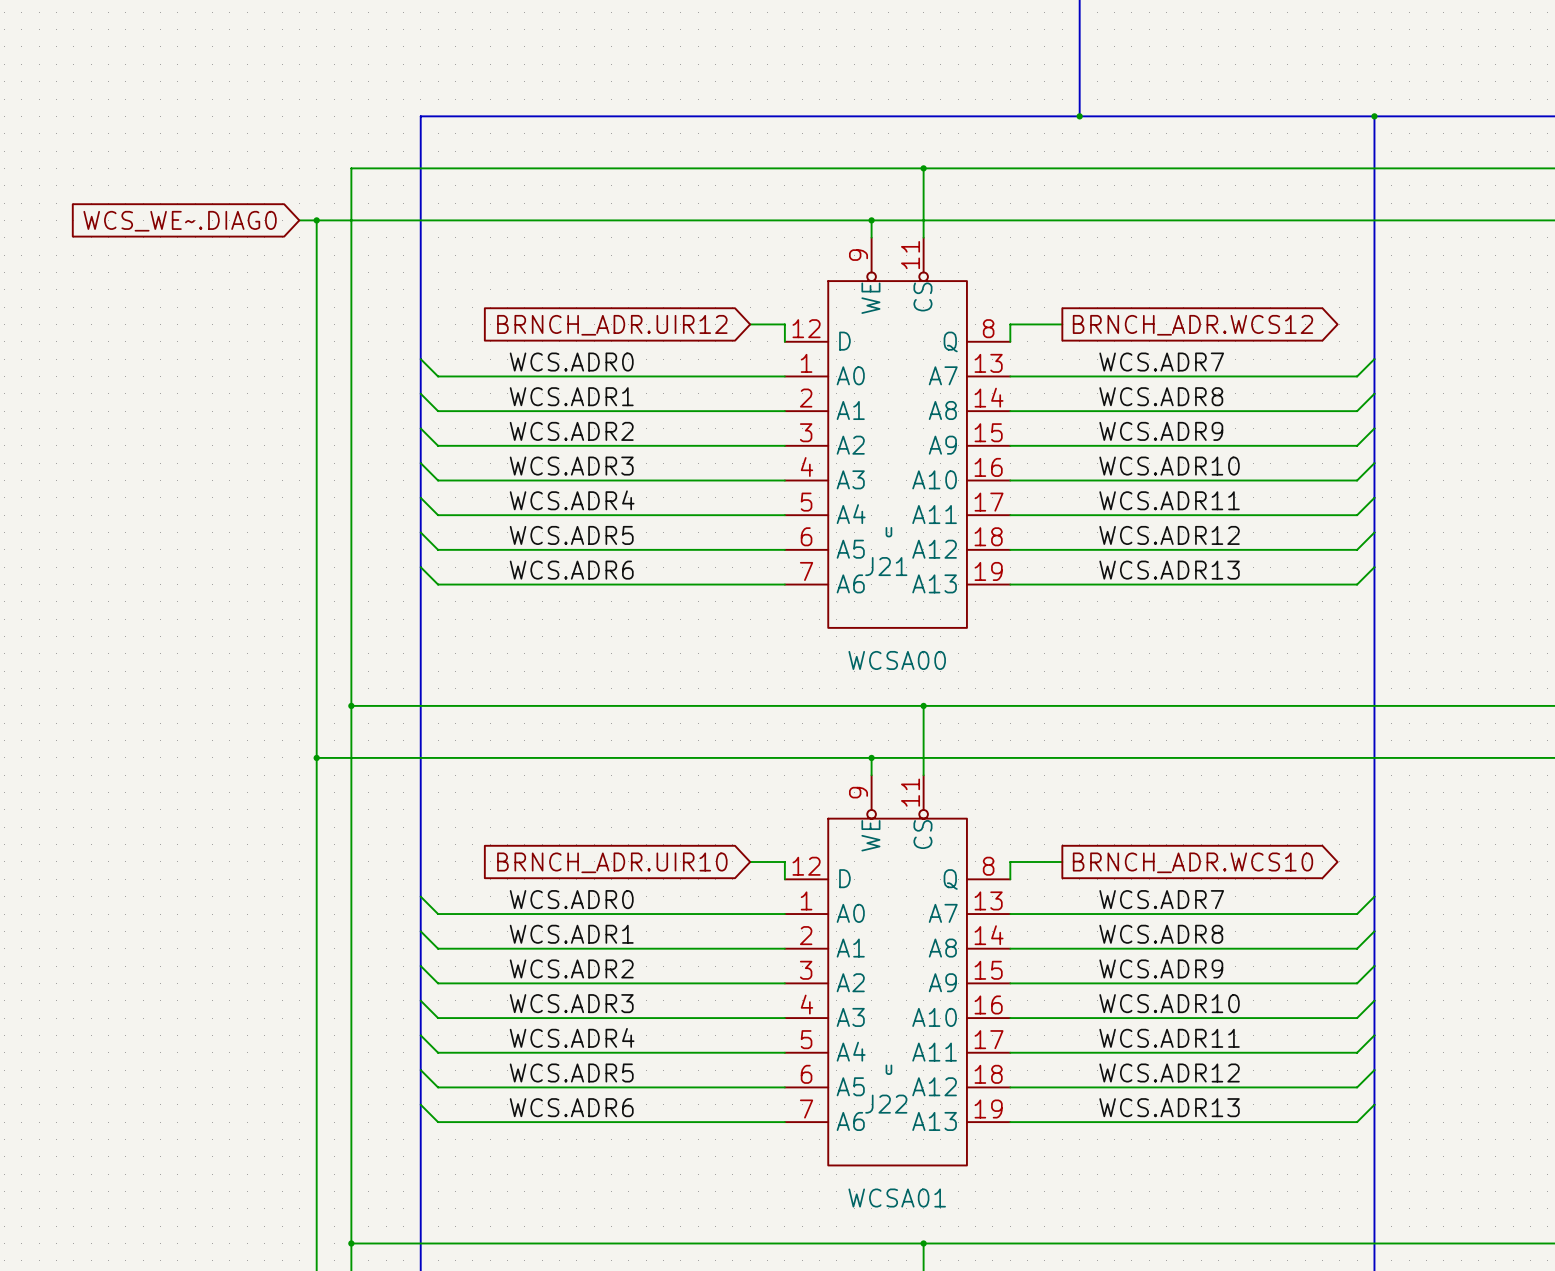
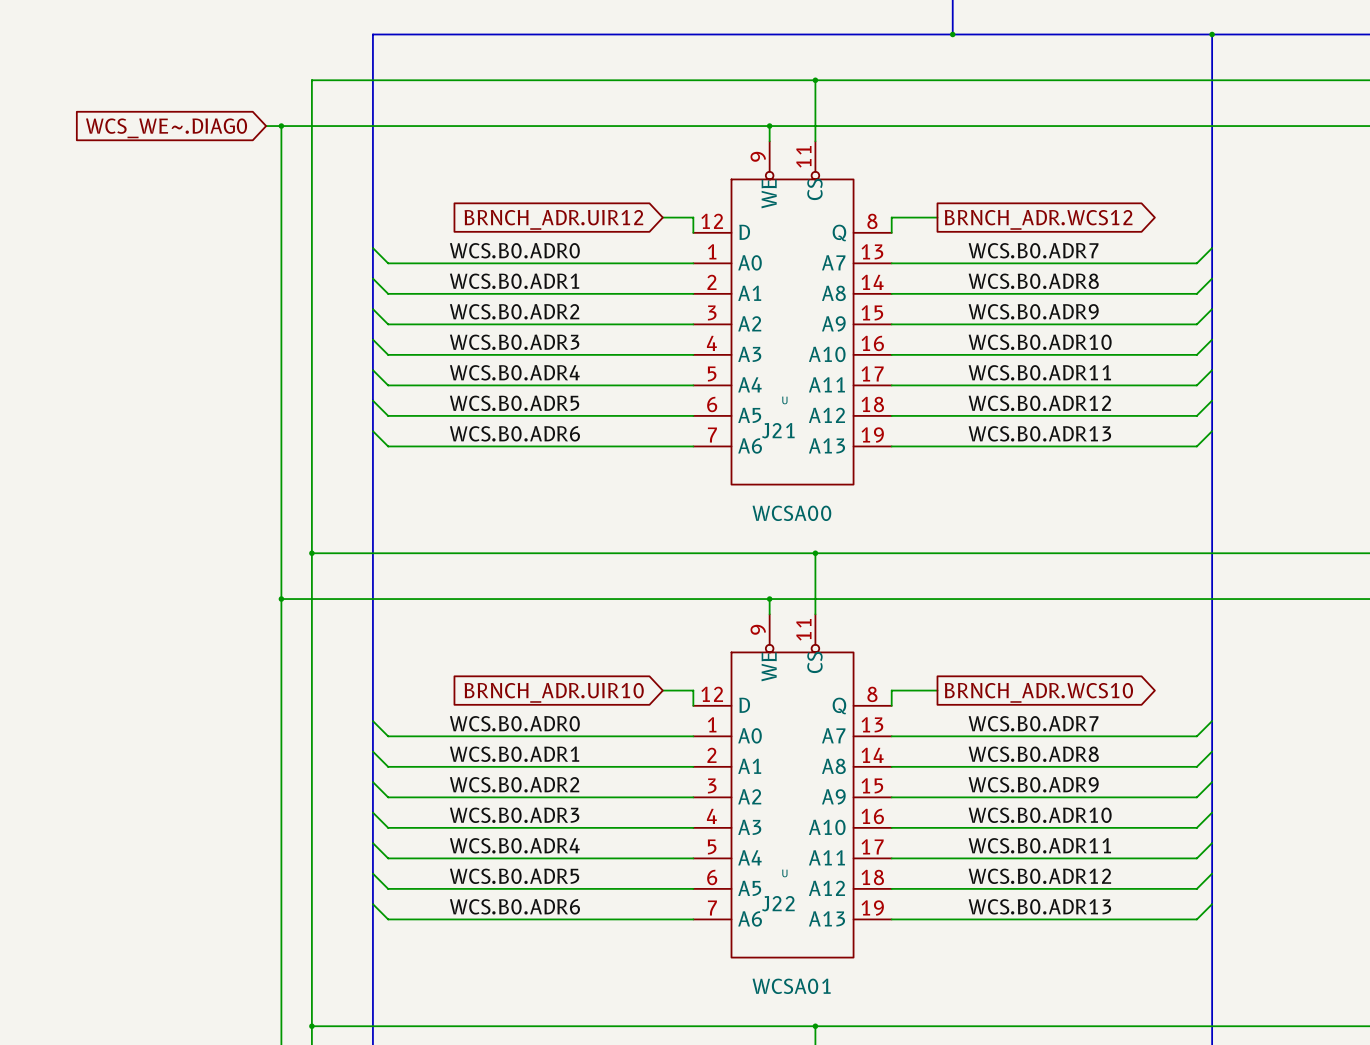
label: WCS.ADR0 (571, 362) -> WCS.B0.ADR0 (514, 250)
label: WCS.ADR7 (1161, 362) -> WCS.B0.ADR7 (1033, 250)
label: WCS.ADR1 (571, 396) -> WCS.B0.ADR1 (514, 281)
label: WCS.ADR8 (1161, 396) -> WCS.B0.ADR8 (1033, 281)
label: WCS.ADR2 (571, 431) -> WCS.B0.ADR2 (514, 311)
label: WCS.ADR9 (1161, 431) -> WCS.B0.ADR9 (1033, 311)
label: WCS.ADR3 (571, 466) -> WCS.B0.ADR3 (514, 342)
label: WCS.ADR10 (1169, 466) -> WCS.B0.ADR10 (1040, 342)
label: WCS.ADR4 (572, 500) -> WCS.B0.ADR4 (514, 372)
label: WCS.ADR11 (1169, 500) -> WCS.B0.ADR11 (1039, 372)
label: WCS.ADR5 (571, 535) -> WCS.B0.ADR5 (514, 403)
label: WCS.ADR12 (1169, 535) -> WCS.B0.ADR12 (1039, 403)
label: WCS.ADR6 (571, 570) -> WCS.B0.ADR6 (514, 433)
label: WCS.ADR13 (1169, 570) -> WCS.B0.ADR13 (1039, 433)
label: WCS.ADR0 (571, 899) -> WCS.B0.ADR0 (514, 723)
label: WCS.ADR7 (1161, 899) -> WCS.B0.ADR7 (1033, 723)
label: WCS.ADR1 (571, 934) -> WCS.B0.ADR1 (514, 754)
label: WCS.ADR8 (1161, 934) -> WCS.B0.ADR8 (1033, 754)
label: WCS.ADR2 (571, 968) -> WCS.B0.ADR2 (514, 784)
label: WCS.ADR9 (1161, 968) -> WCS.B0.ADR9 (1033, 784)
label: WCS.ADR3 (571, 1003) -> WCS.B0.ADR3 (514, 815)
label: WCS.ADR10 (1169, 1003) -> WCS.B0.ADR10 (1040, 815)
label: WCS.ADR4 (572, 1037) -> WCS.B0.ADR4 (514, 845)
label: WCS.ADR11 (1169, 1038) -> WCS.B0.ADR11 (1039, 845)
label: WCS.ADR5 (571, 1072) -> WCS.B0.ADR5 (514, 876)
label: WCS.ADR12 (1169, 1072) -> WCS.B0.ADR12 (1039, 876)
label: WCS.ADR6 (571, 1107) -> WCS.B0.ADR6 (514, 906)
label: WCS.ADR13 (1169, 1107) -> WCS.B0.ADR13 (1039, 906)

